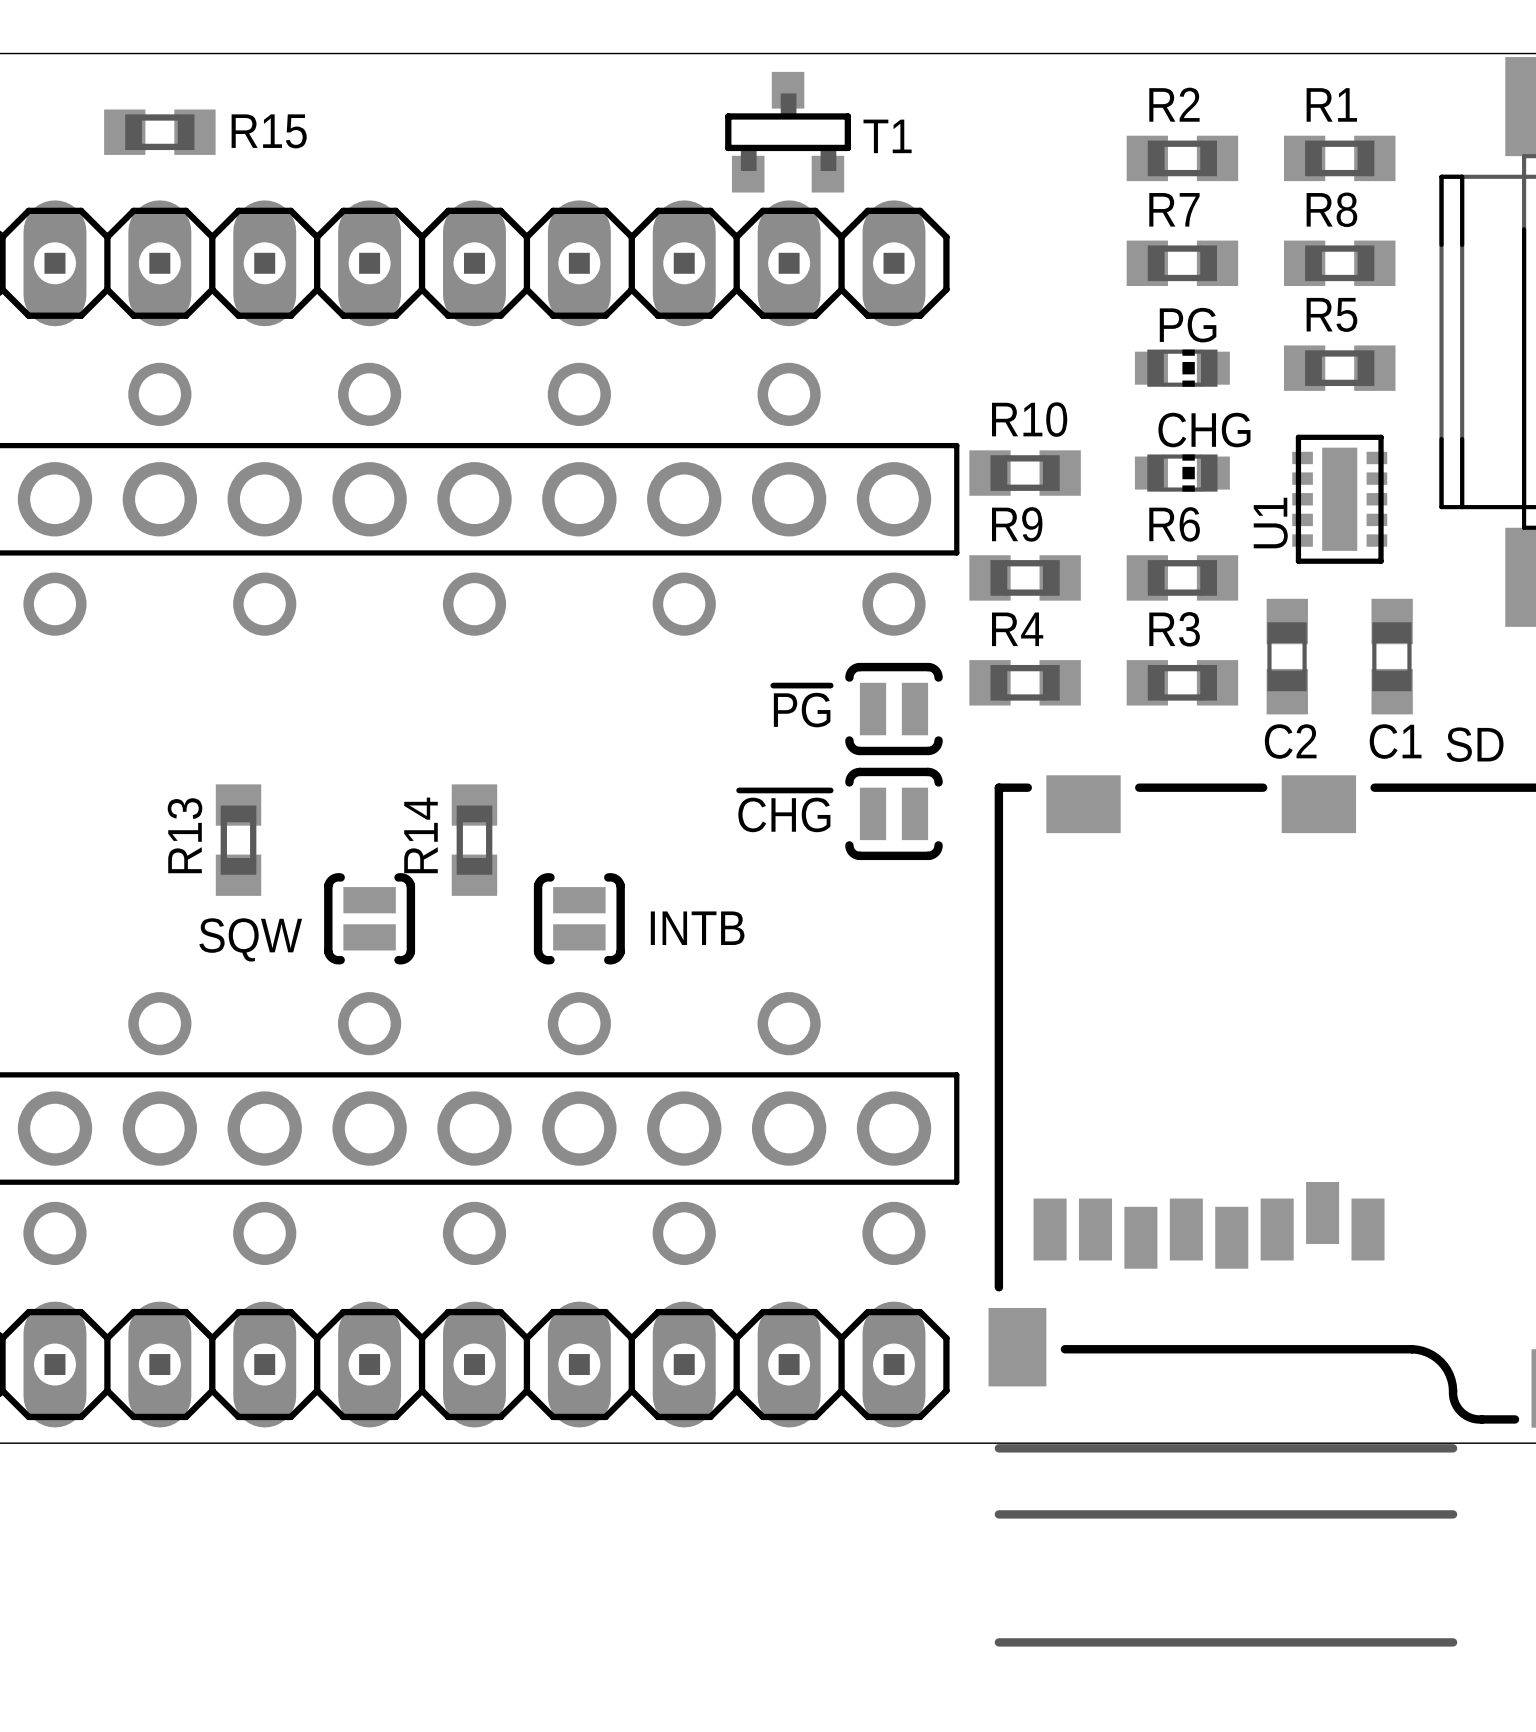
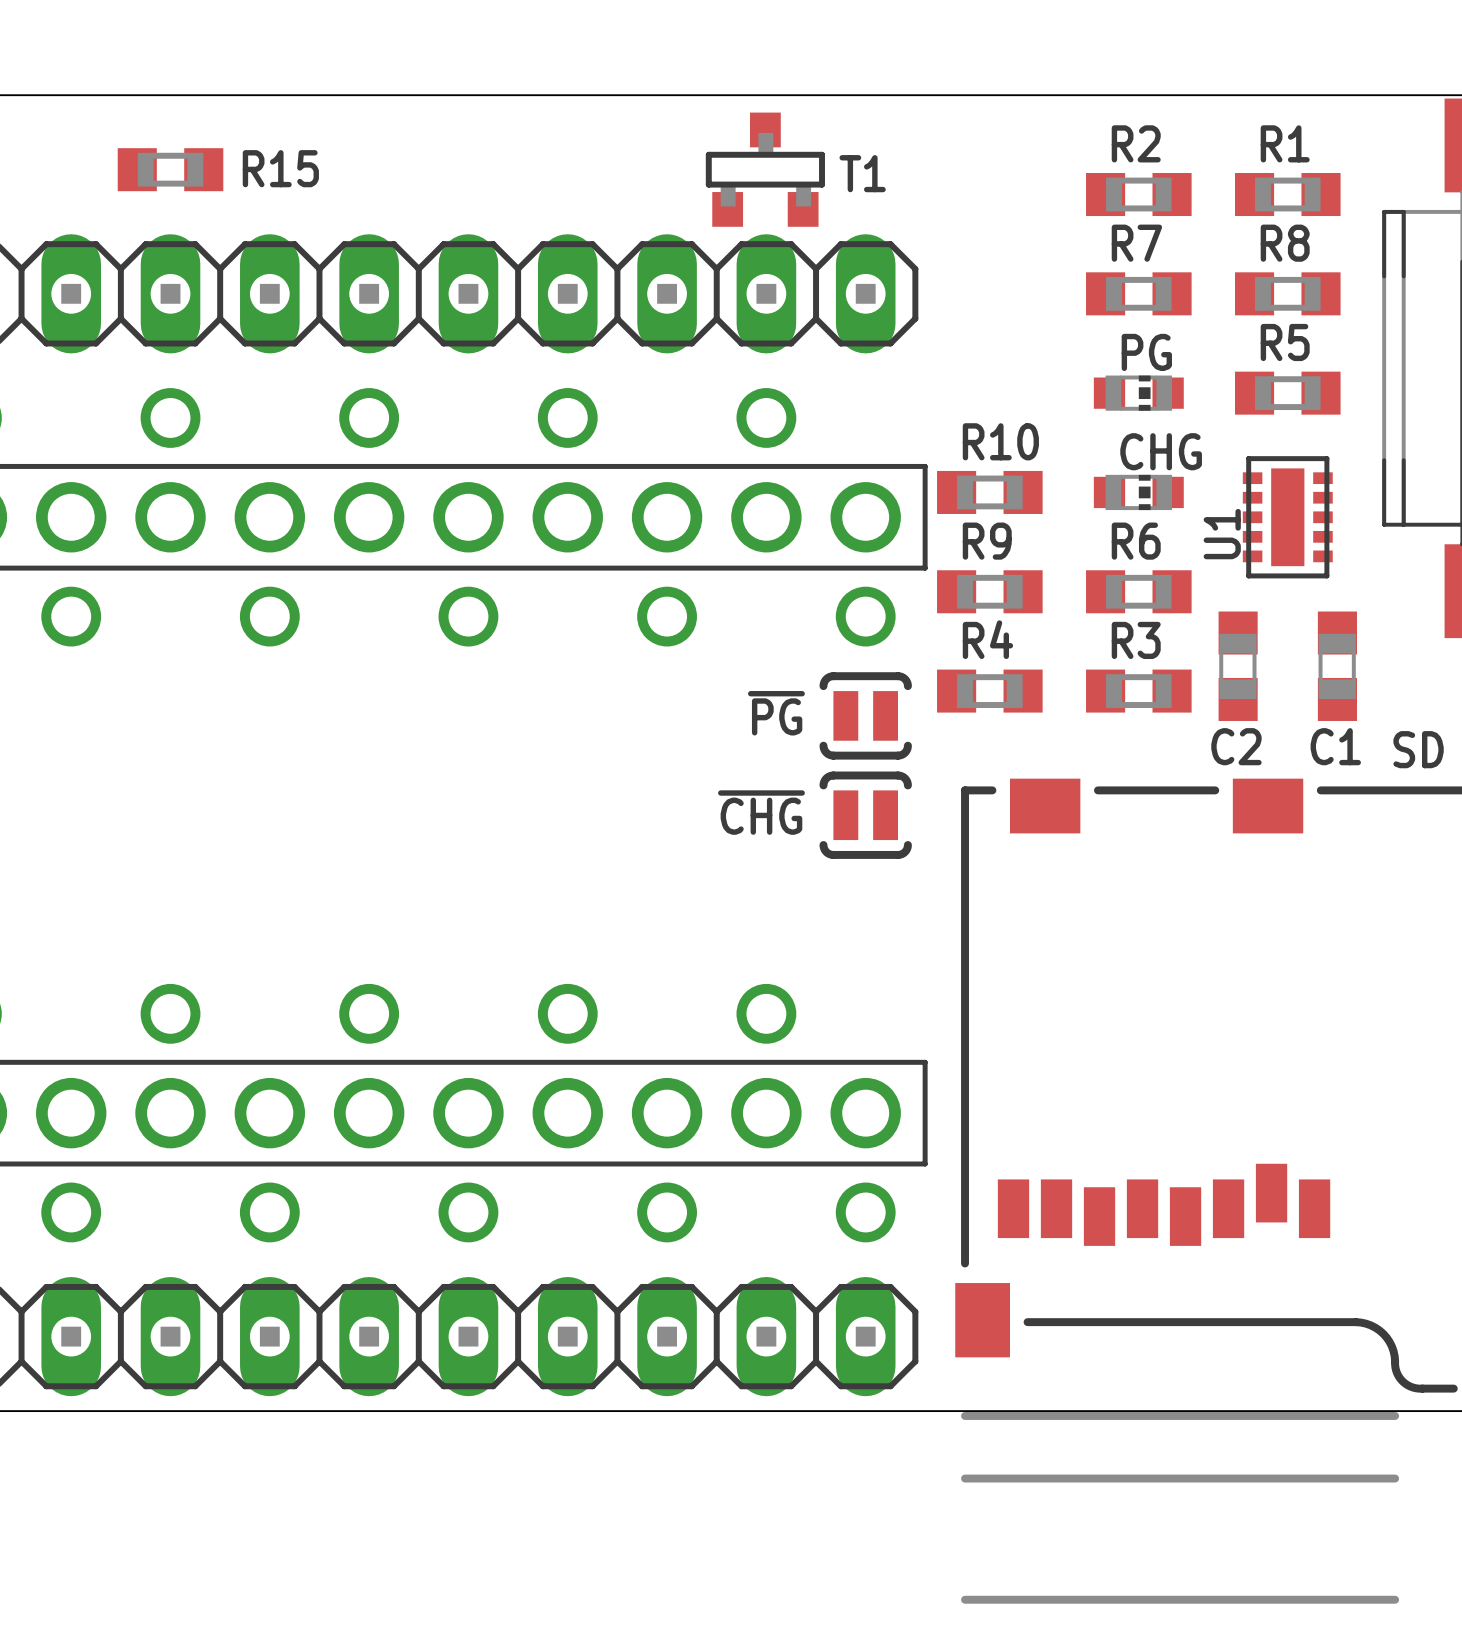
R13: (238, 840) -> none
R14: (474, 840) -> none
SQW: (369, 918) -> none
INTB: (579, 918) -> none

